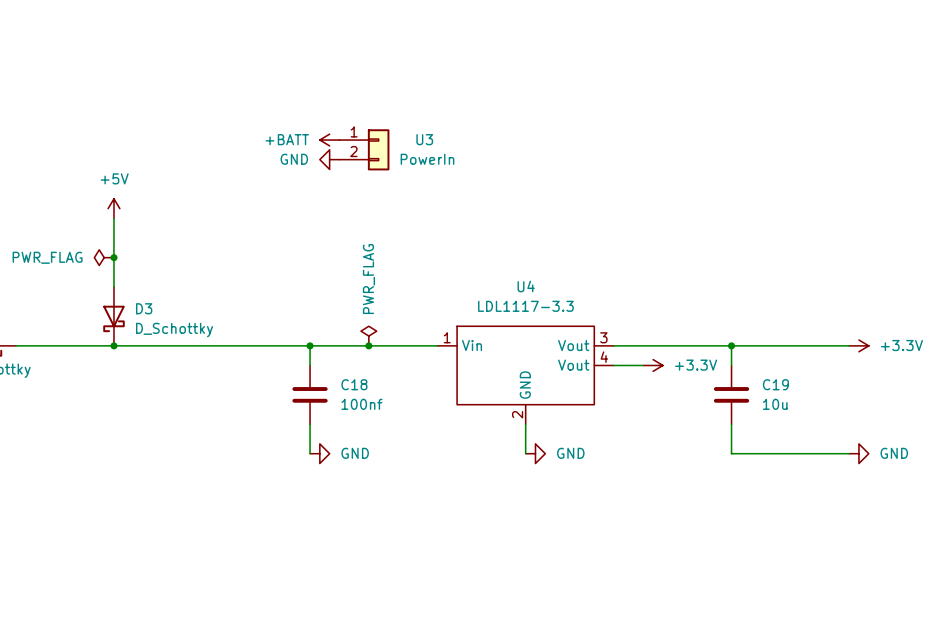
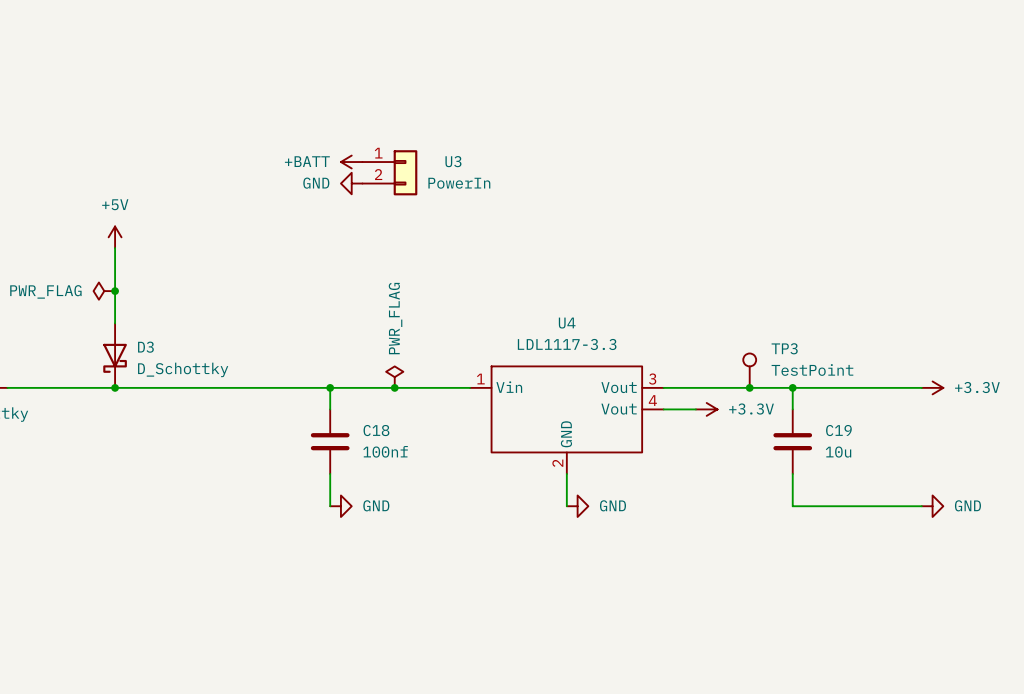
TP3: none -> TestPoint (749, 370)
junction: none -> (749, 387)

